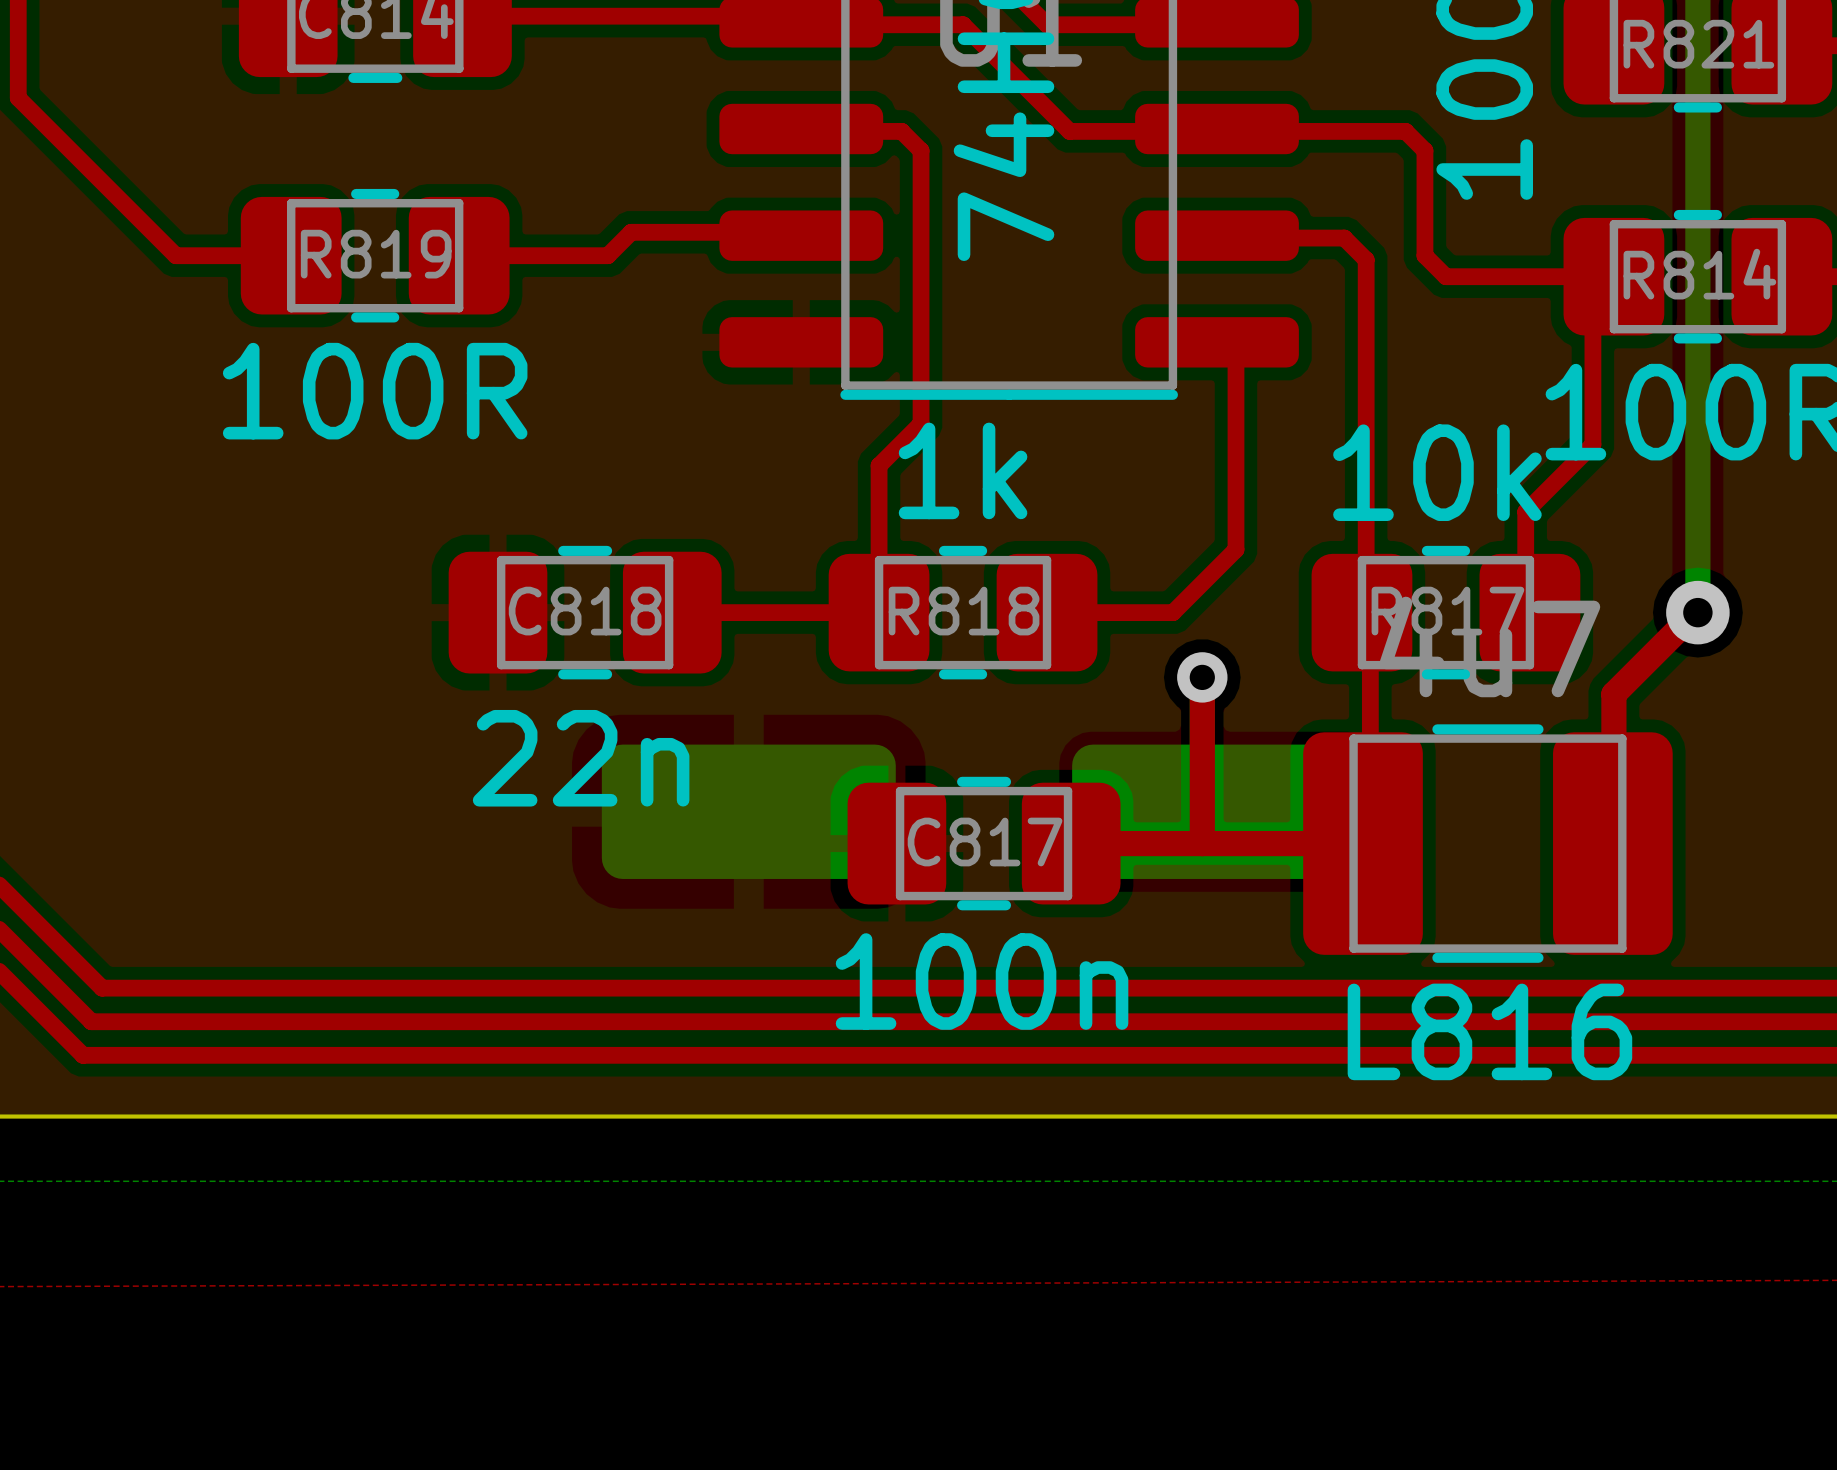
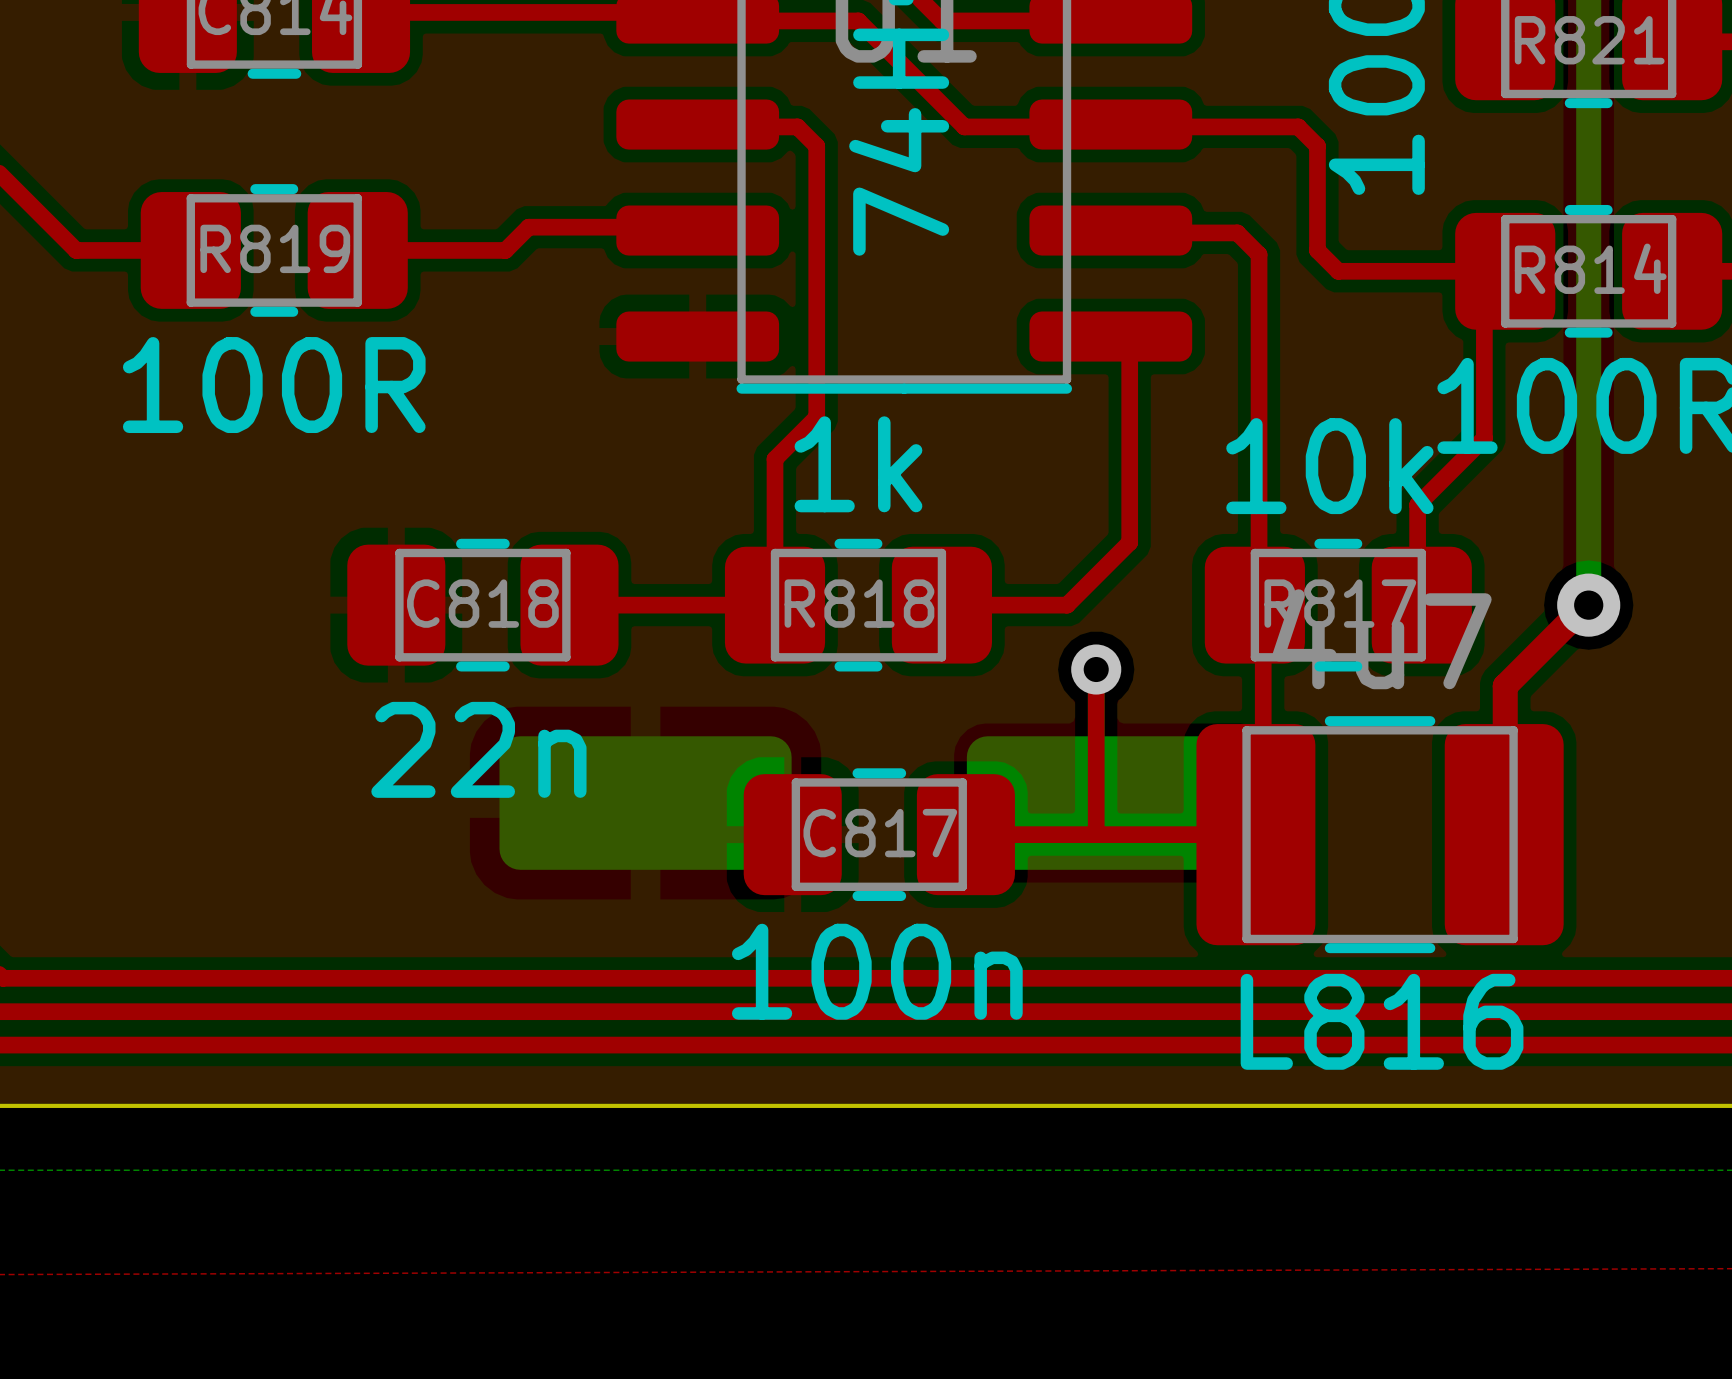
top track width: thick (1202, 677) (1202, 843) -> thin (1096, 669) (1096, 834)
top track width: thick (1071, 843) (1370, 843) -> thin (965, 834) (1263, 834)

